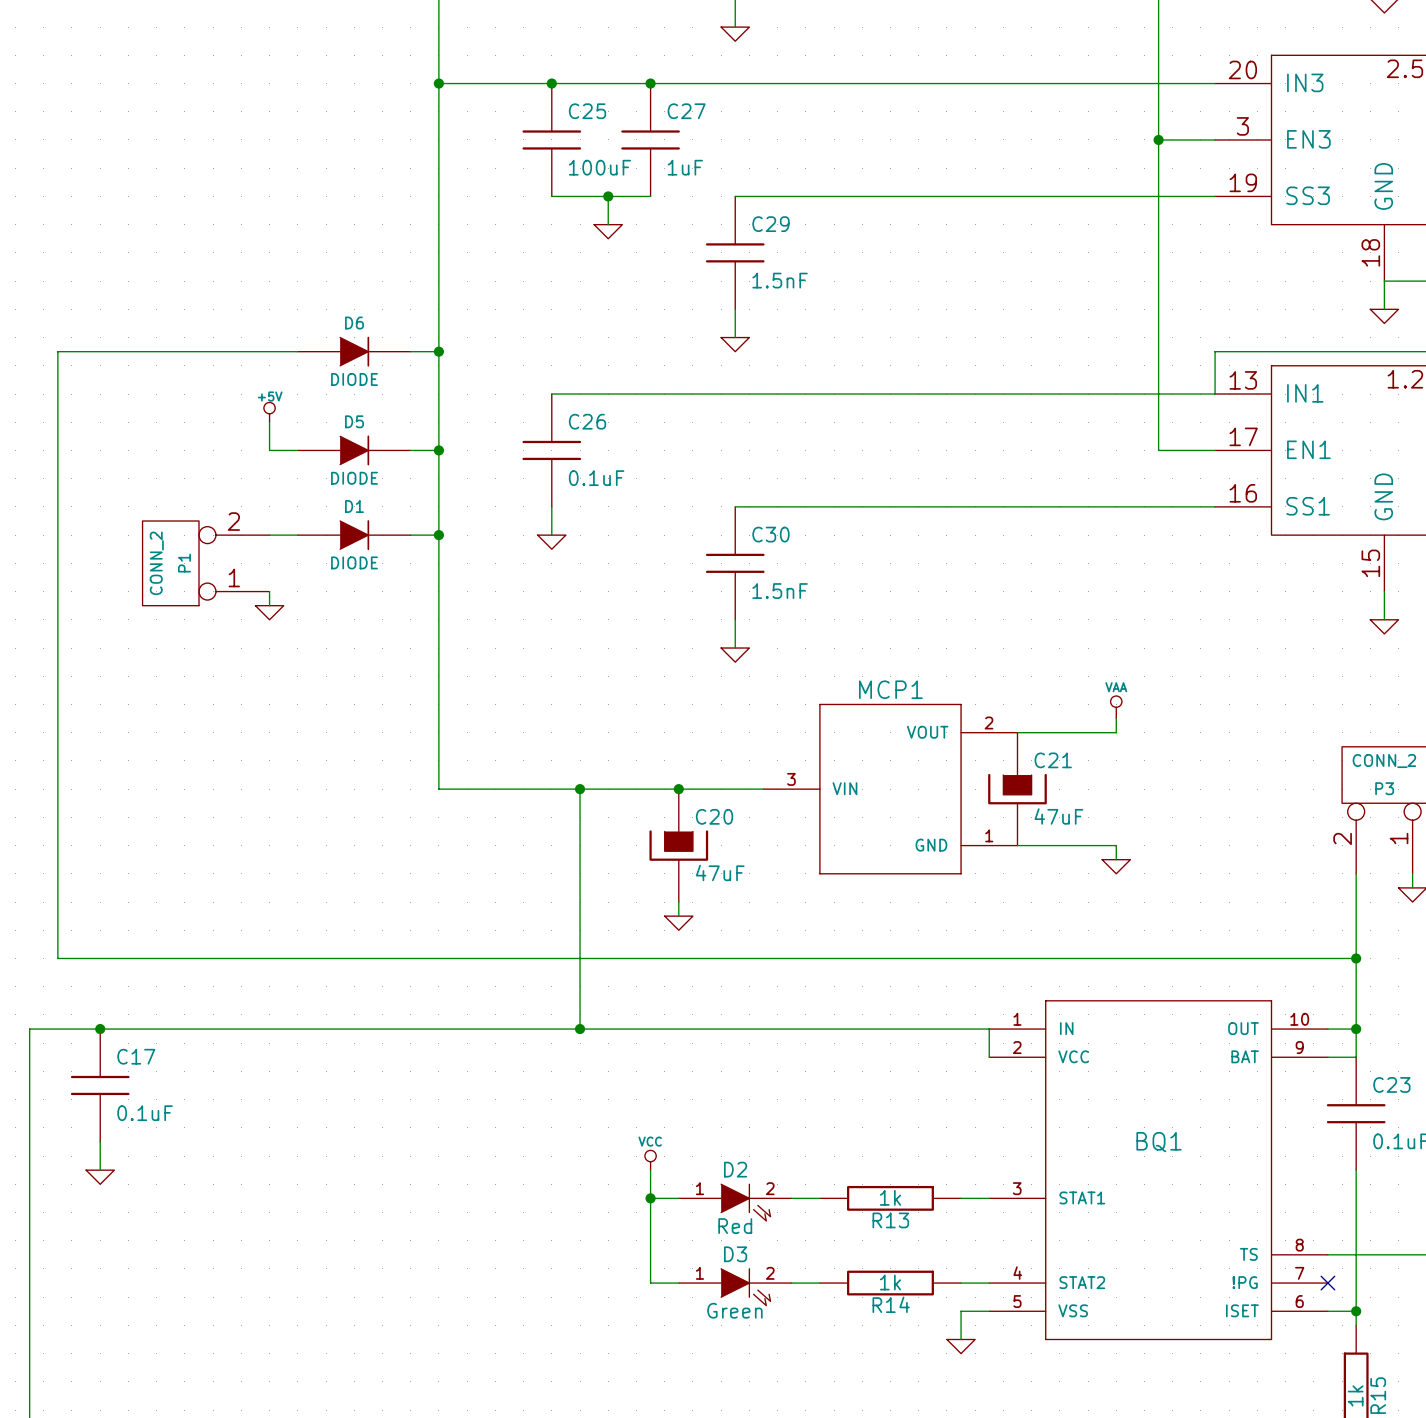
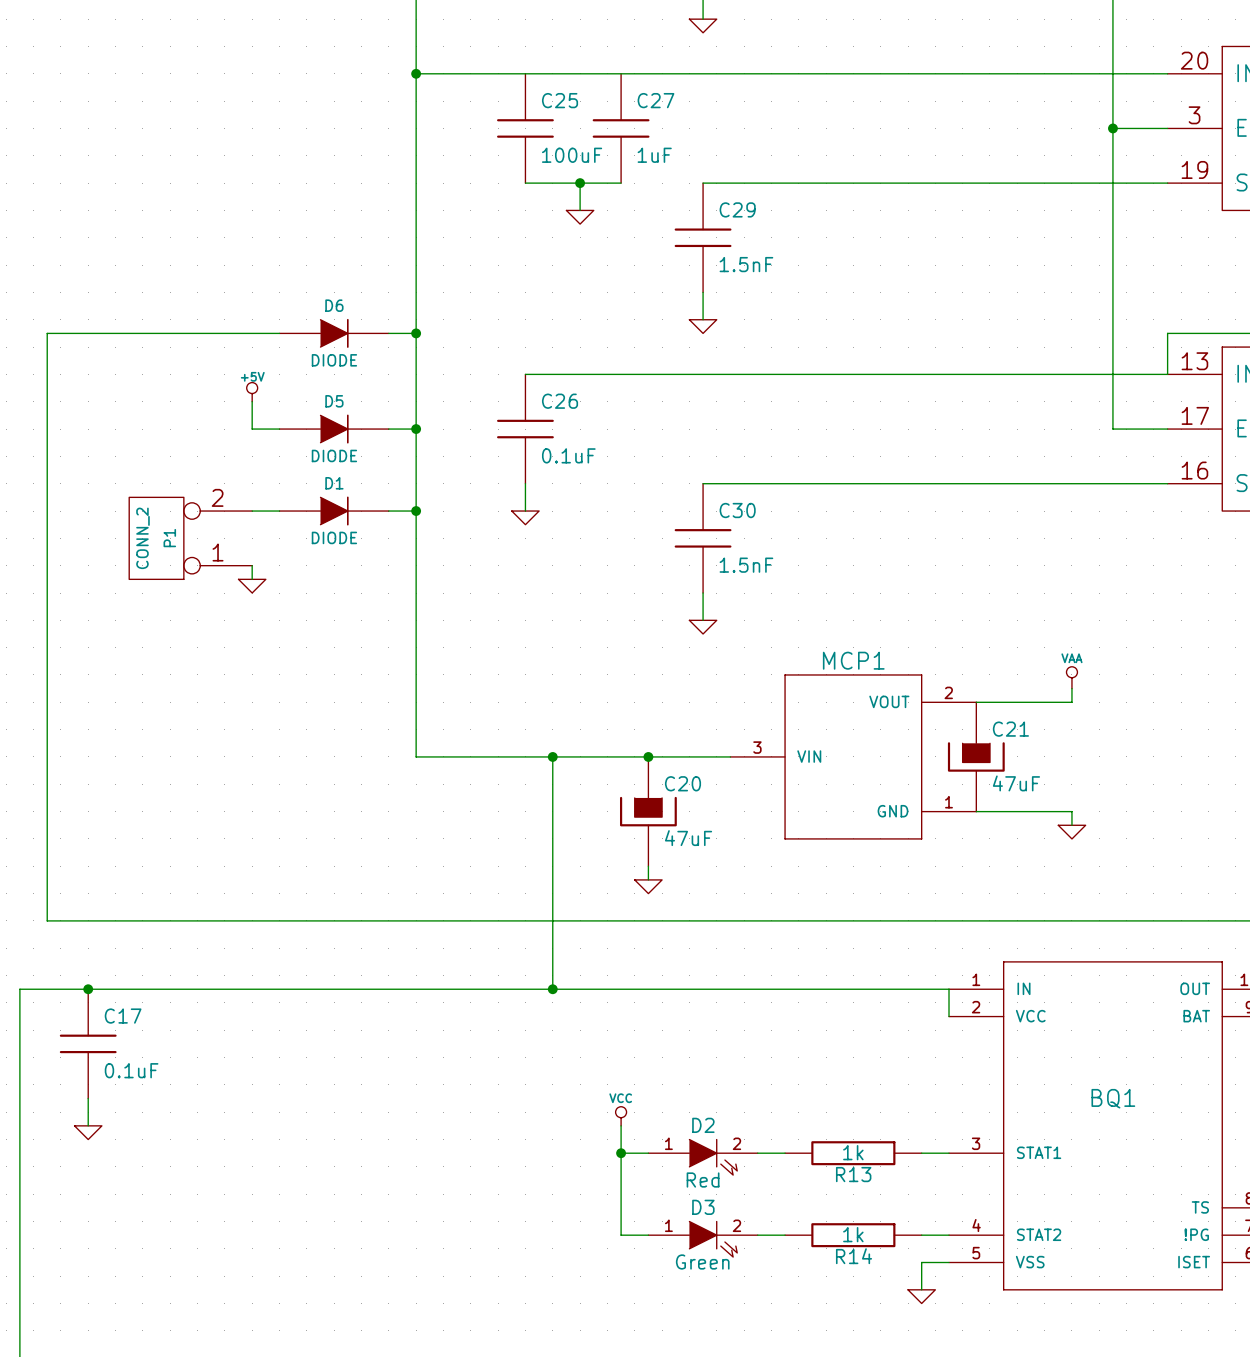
junction: (551, 83) -> none
junction: (650, 83) -> none

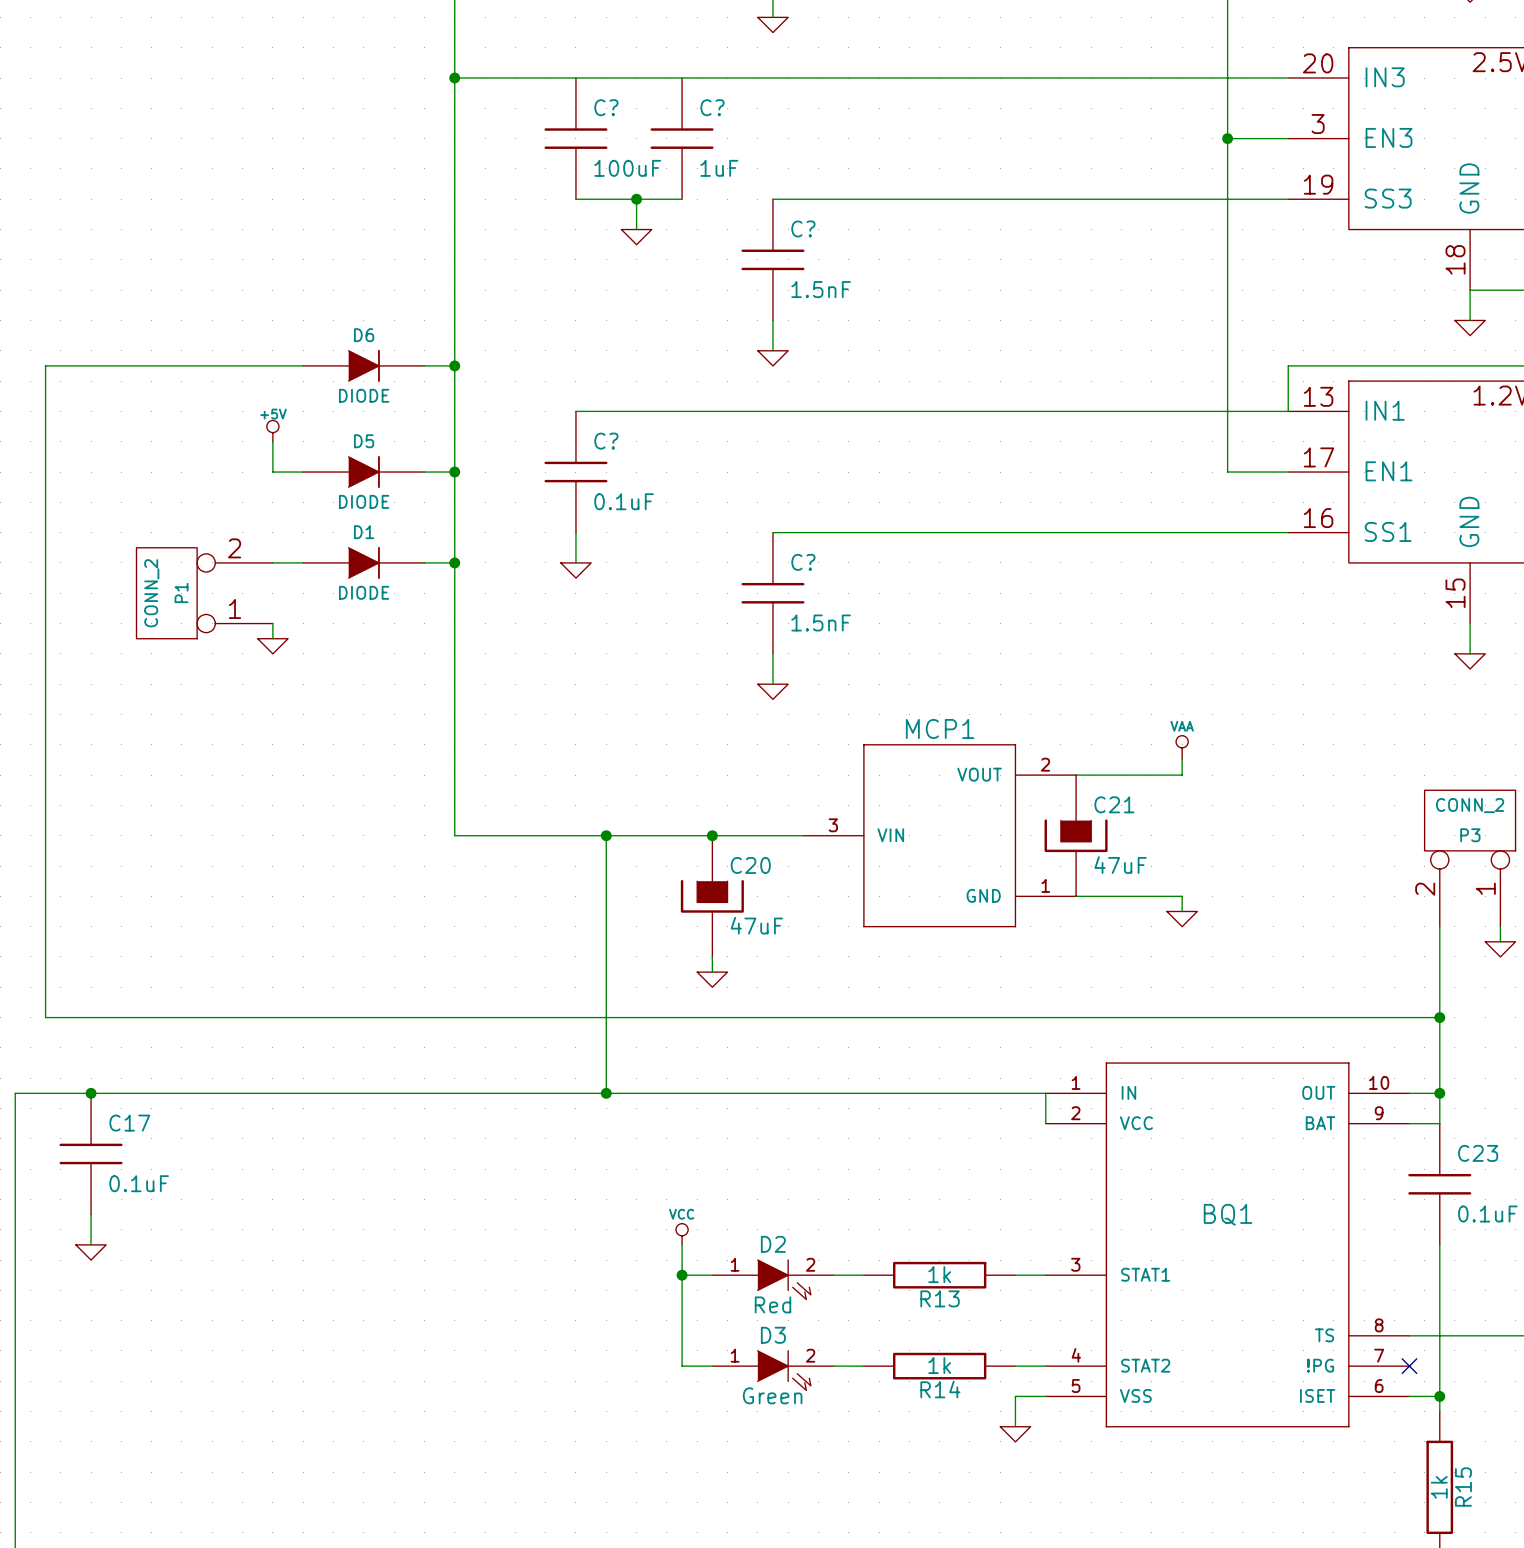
C25 name: C25 (560, 100) -> C? (606, 107)
C27 name: C27 (655, 100) -> C? (712, 107)
C29 name: C29 (737, 209) -> C? (803, 228)
C26 name: C26 (560, 401) -> C? (606, 441)
C30 name: C30 (737, 510) -> C? (803, 562)

